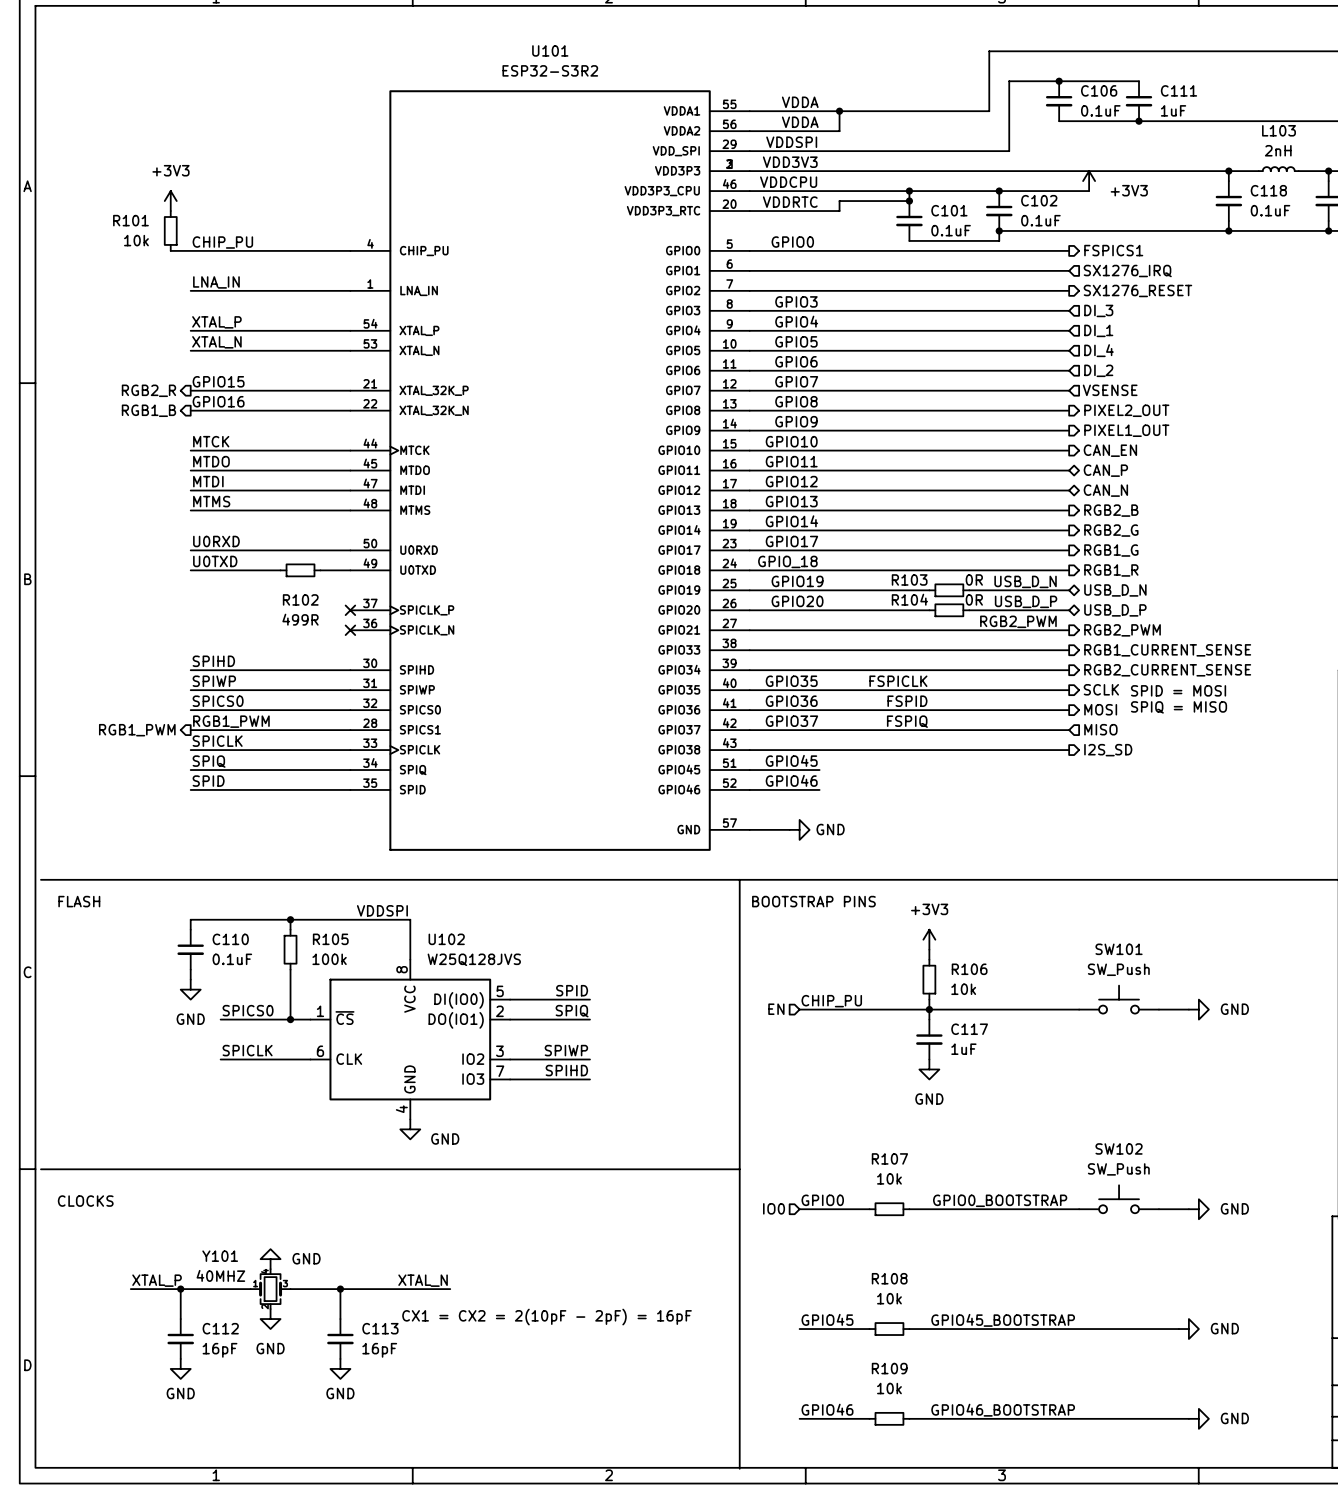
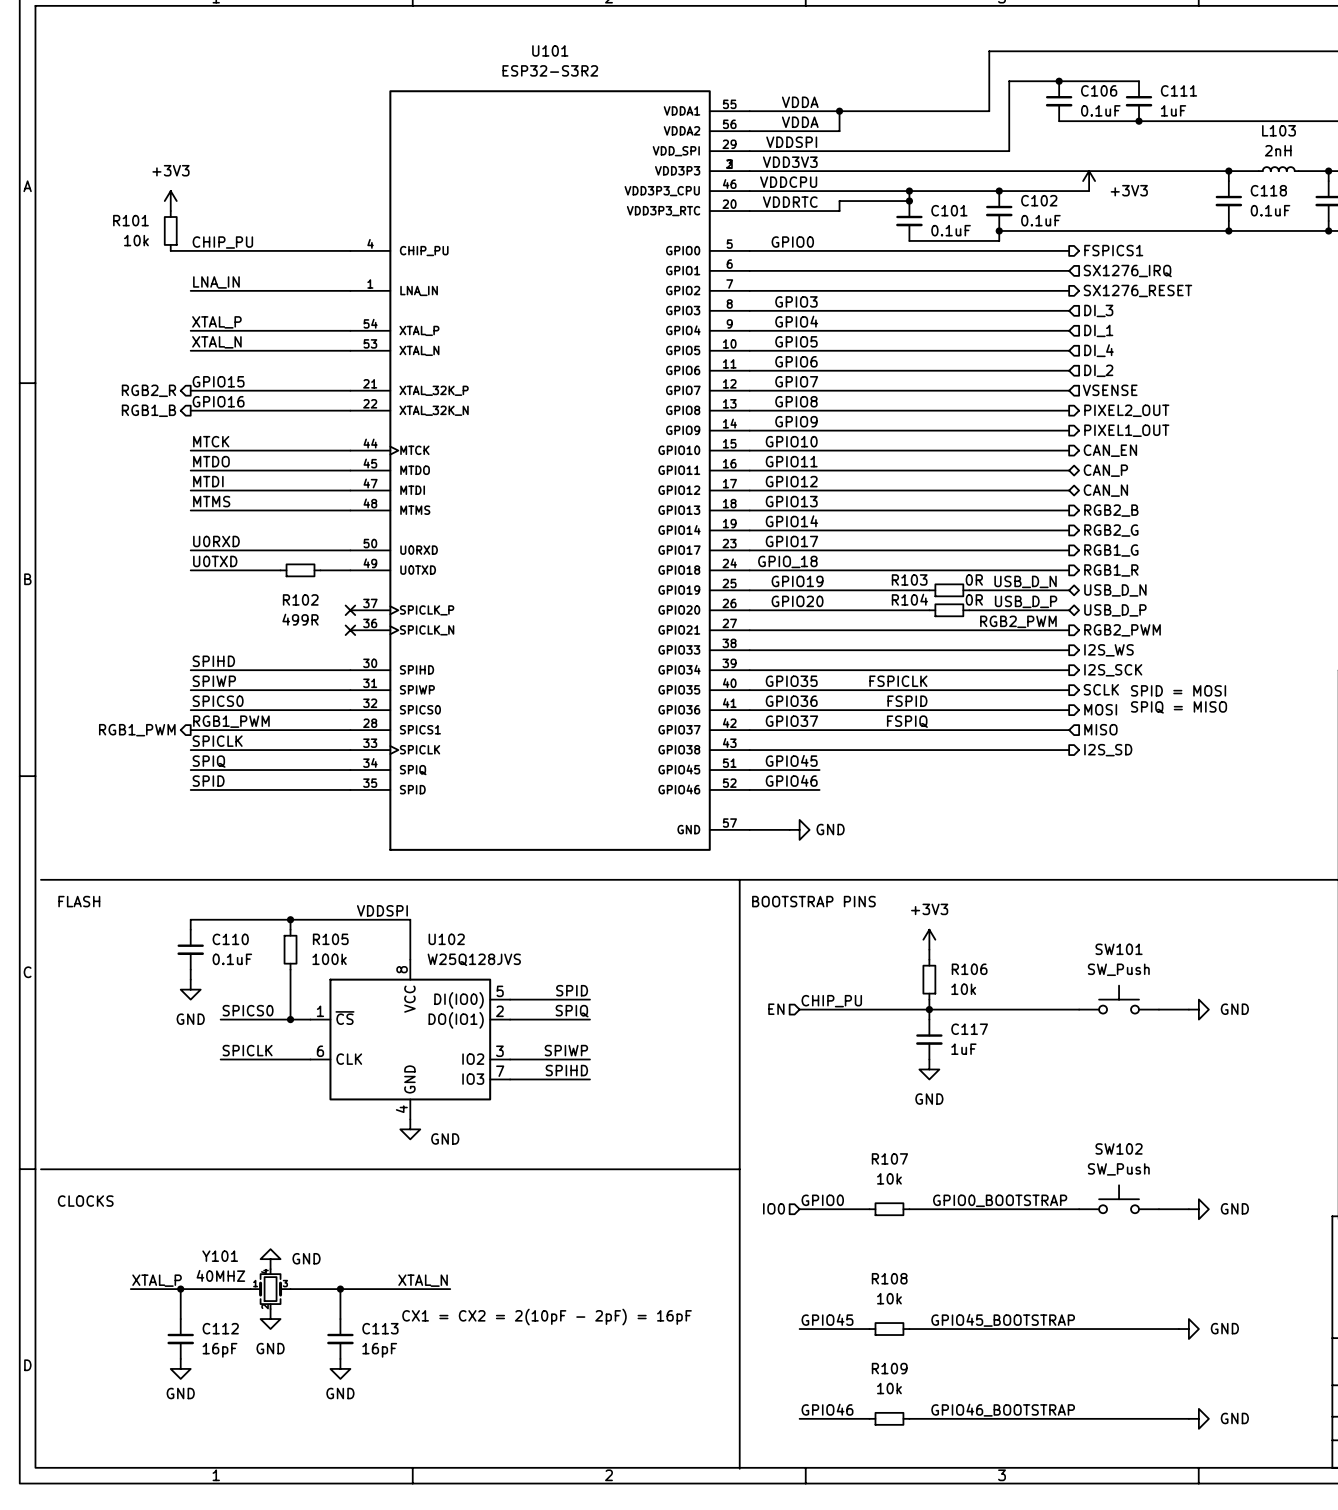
hierarchical label: RGB1_CURRENT_SENSE (1167, 650) -> I2S_WS (1108, 650)
hierarchical label: RGB2_CURRENT_SENSE (1167, 670) -> I2S_SCK (1113, 670)

